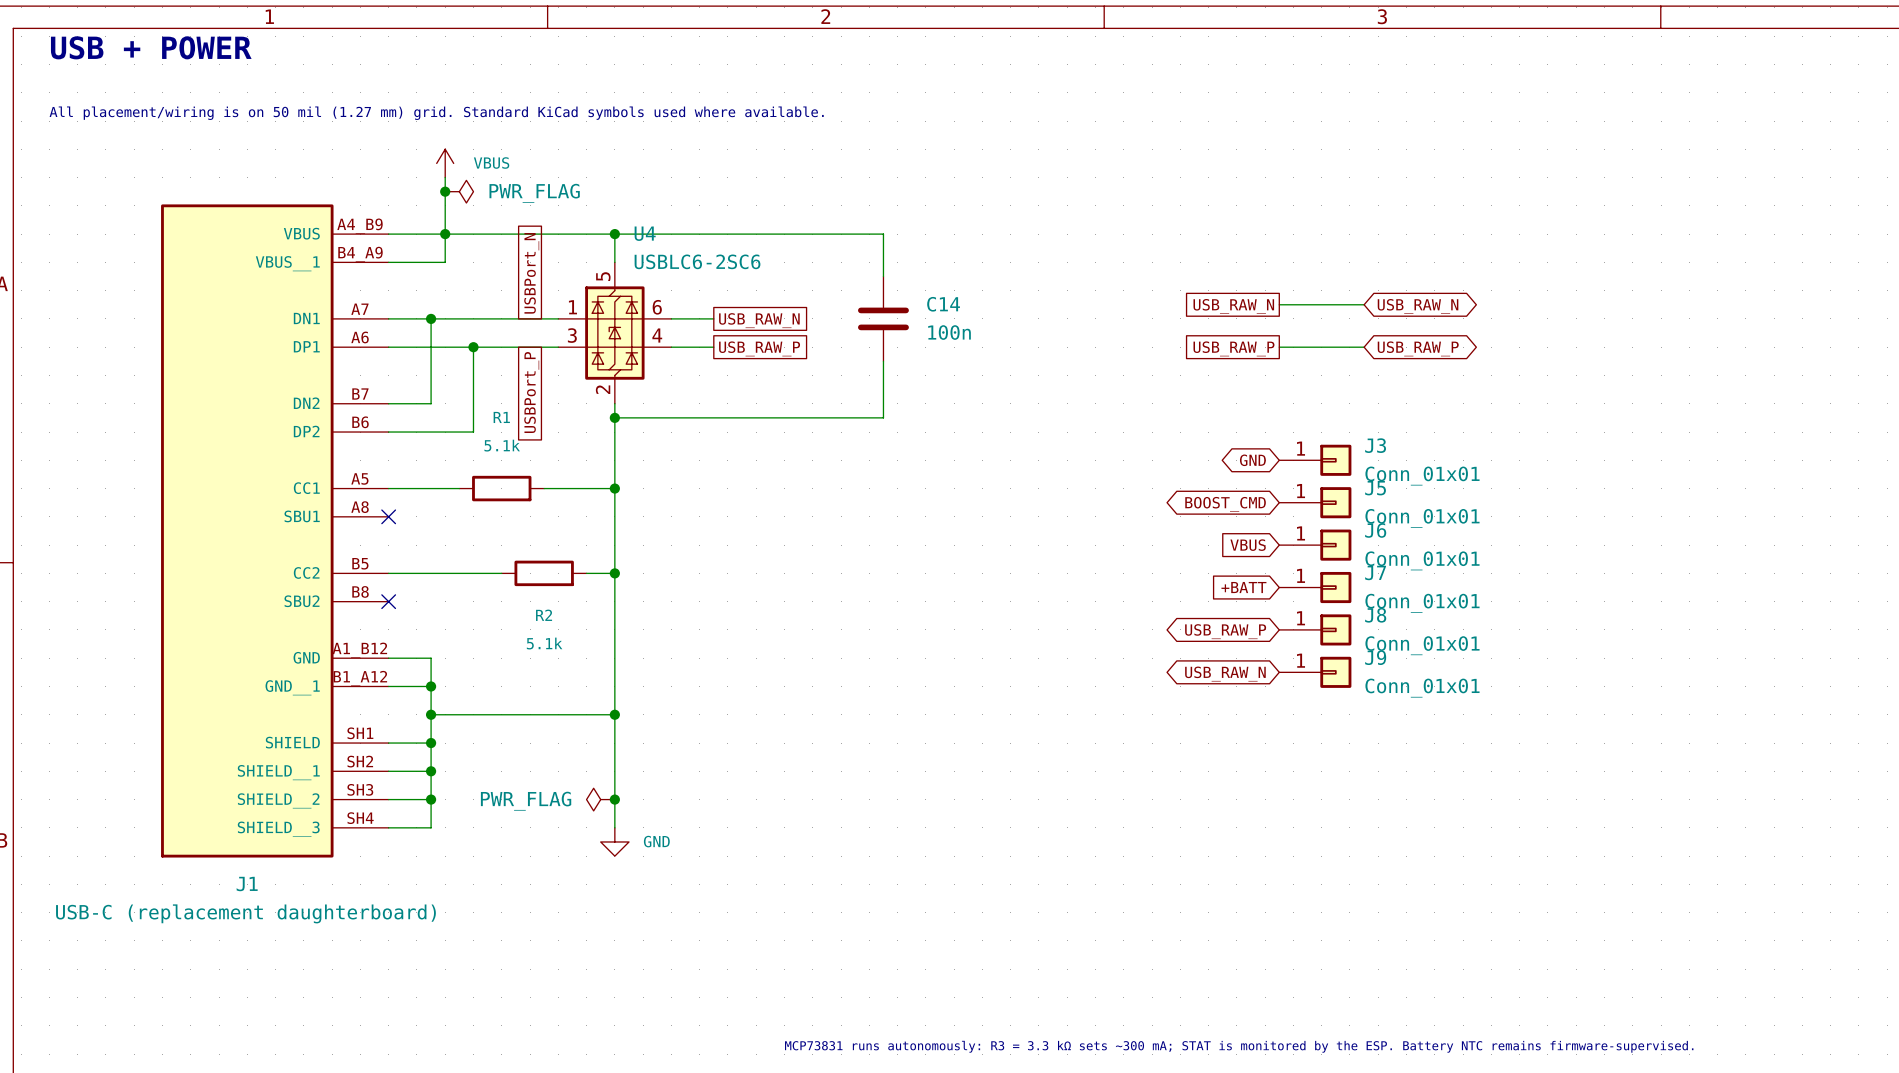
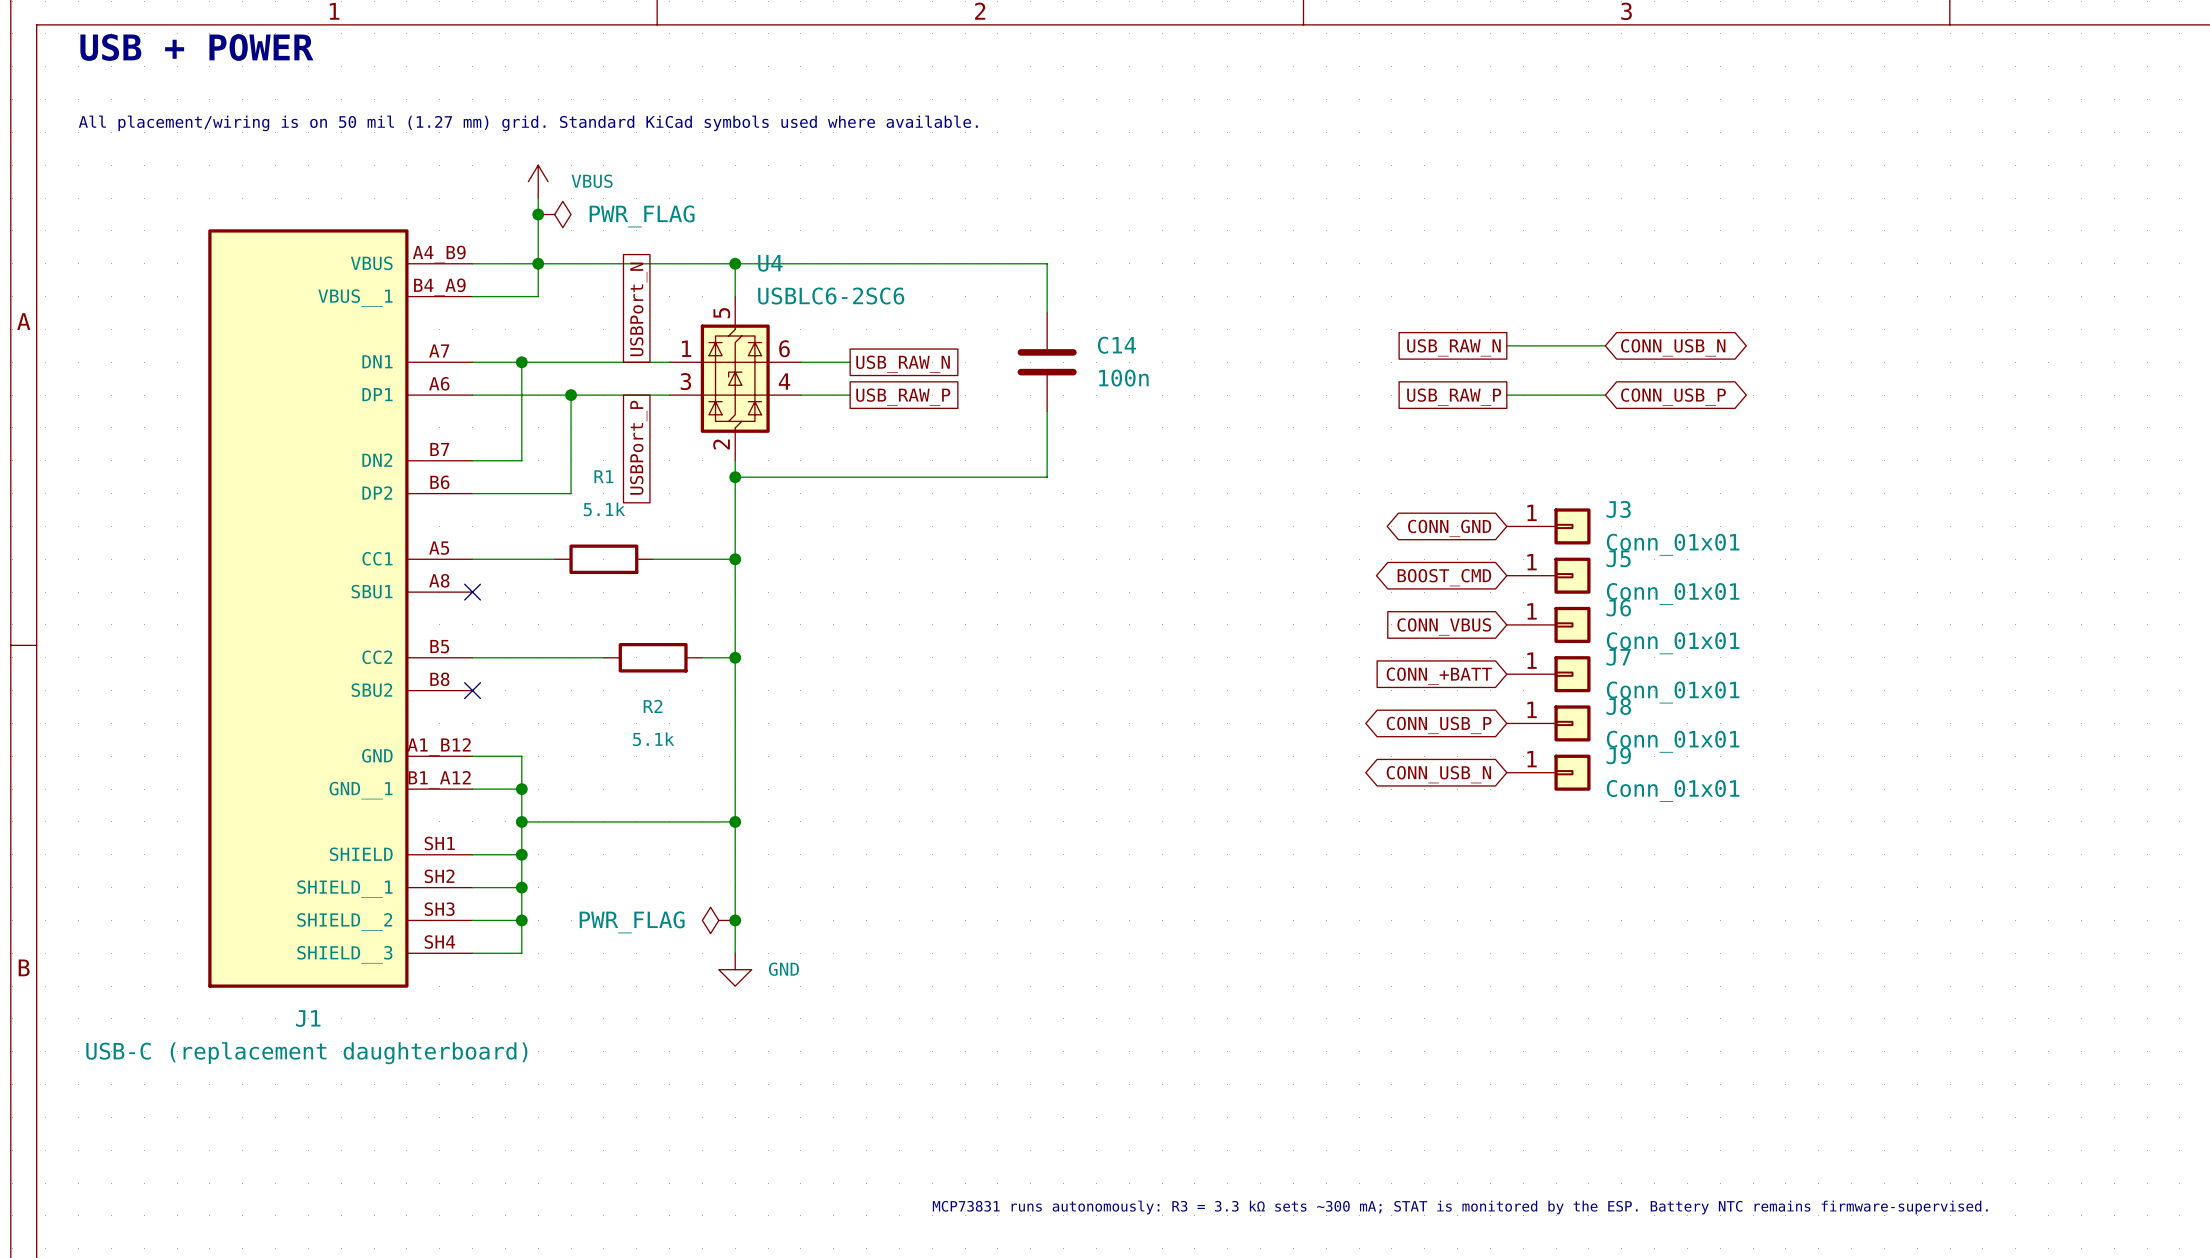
global label: USB_RAW_N (1418, 306) -> CONN_USB_N (1673, 347)
global label: USB_RAW_P (1418, 348) -> CONN_USB_P (1673, 397)
global label: GND (1252, 460) -> CONN_GND (1449, 528)
global label: VBUS (1248, 545) -> CONN_VBUS (1444, 626)
global label: +BATT (1243, 587) -> CONN_+BATT (1439, 676)
global label: USB_RAW_P (1225, 631) -> CONN_USB_P (1439, 725)
global label: USB_RAW_N (1225, 674) -> CONN_USB_N (1438, 774)

